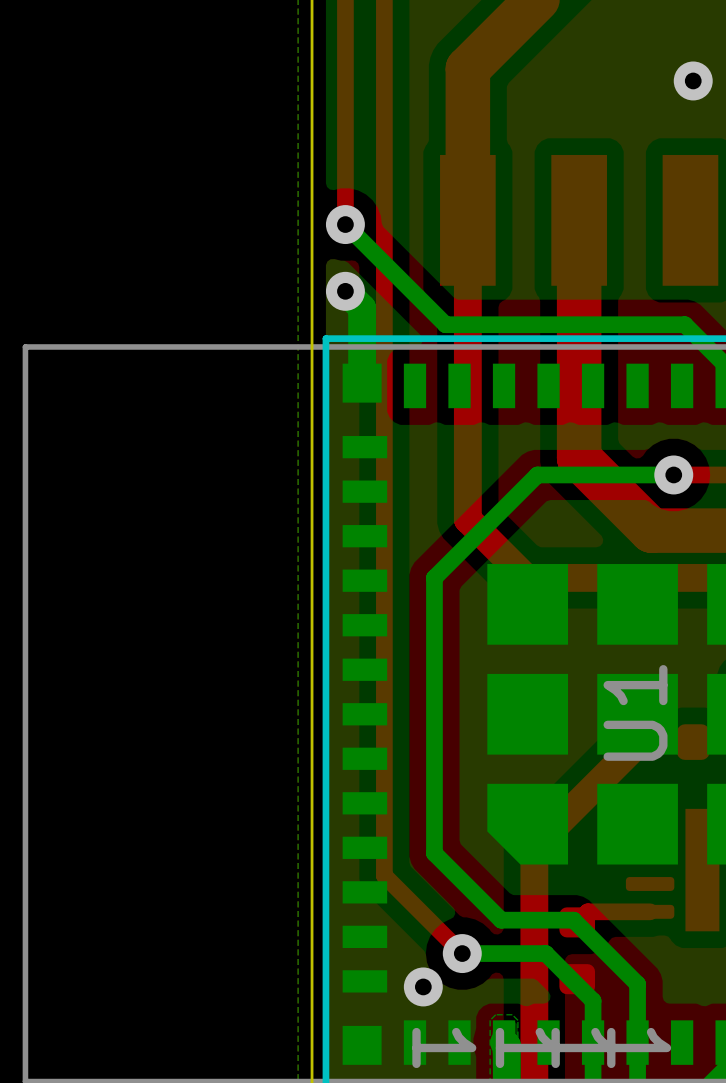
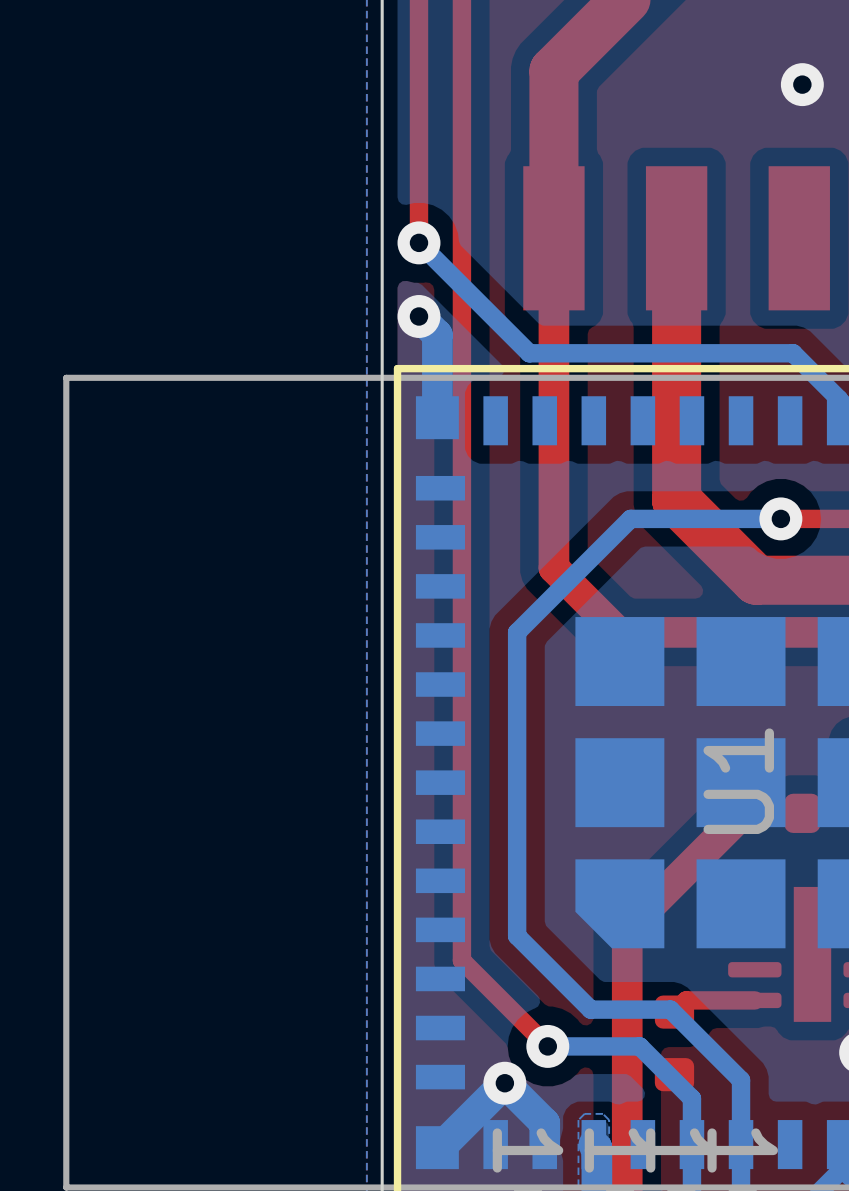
bottom track: none -> (544, 1144) (544, 1123) (504, 1083) (440, 1147)

